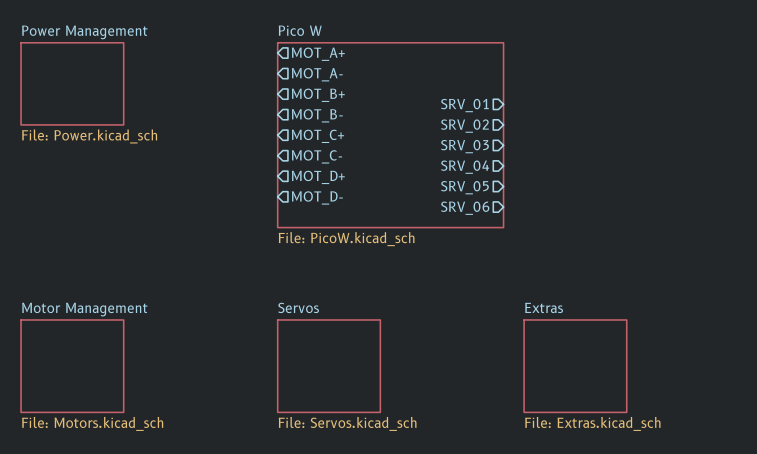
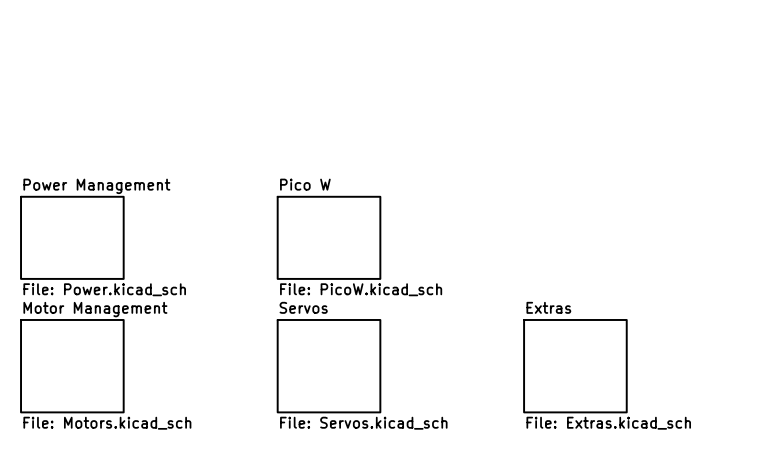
sheet pin: MOT_A+ (318, 54) -> none
sheet pin: MOT_A- (317, 74) -> none
sheet Power Management position: (72, 83) -> (72, 237)
sheet pin: MOT_B+ (318, 95) -> none
sheet pin: SRV_01 (464, 105) -> none
sheet pin: MOT_B- (317, 115) -> none
sheet pin: SRV_02 (464, 126) -> none
sheet Pico W: File: PicoW.kicad_sch (390, 135) -> none
sheet pin: MOT_C+ (317, 136) -> none
sheet pin: SRV_03 (464, 146) -> none
sheet pin: MOT_C- (316, 156) -> none
sheet pin: SRV_04 (465, 167) -> none
sheet pin: MOT_D+ (318, 177) -> none
sheet pin: SRV_05 (464, 187) -> none
sheet pin: MOT_D- (317, 197) -> none
sheet pin: SRV_06 (465, 208) -> none
sheet Pico W: none -> File: PicoW.kicad_sch (329, 237)

